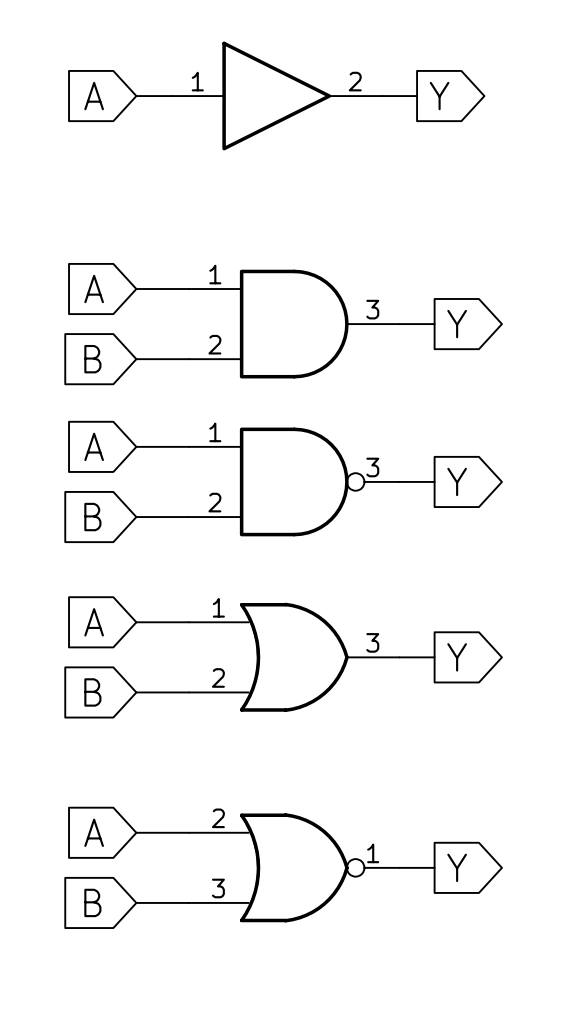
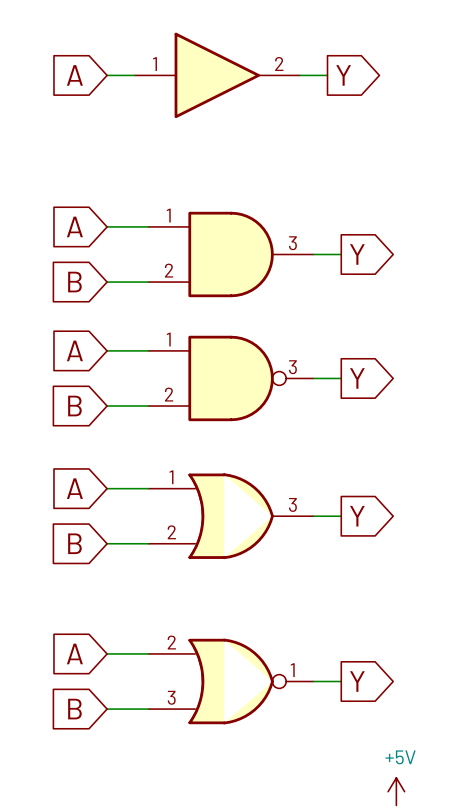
power symbol: none -> +5V (396, 791)

